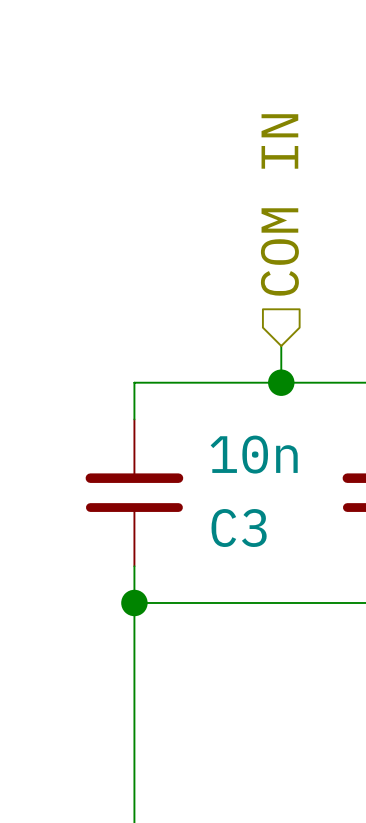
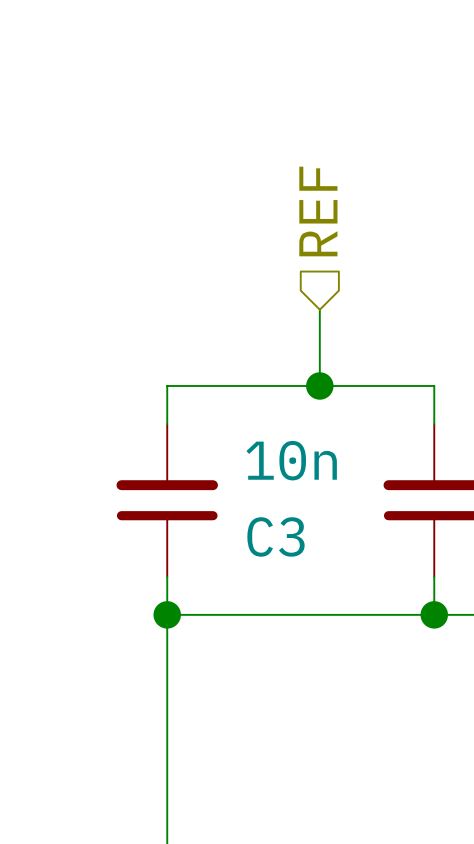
hierarchical label: COM IN (279, 204) -> none
hierarchical label: none -> REF (318, 211)
wire: none -> (319, 309) (319, 347)

